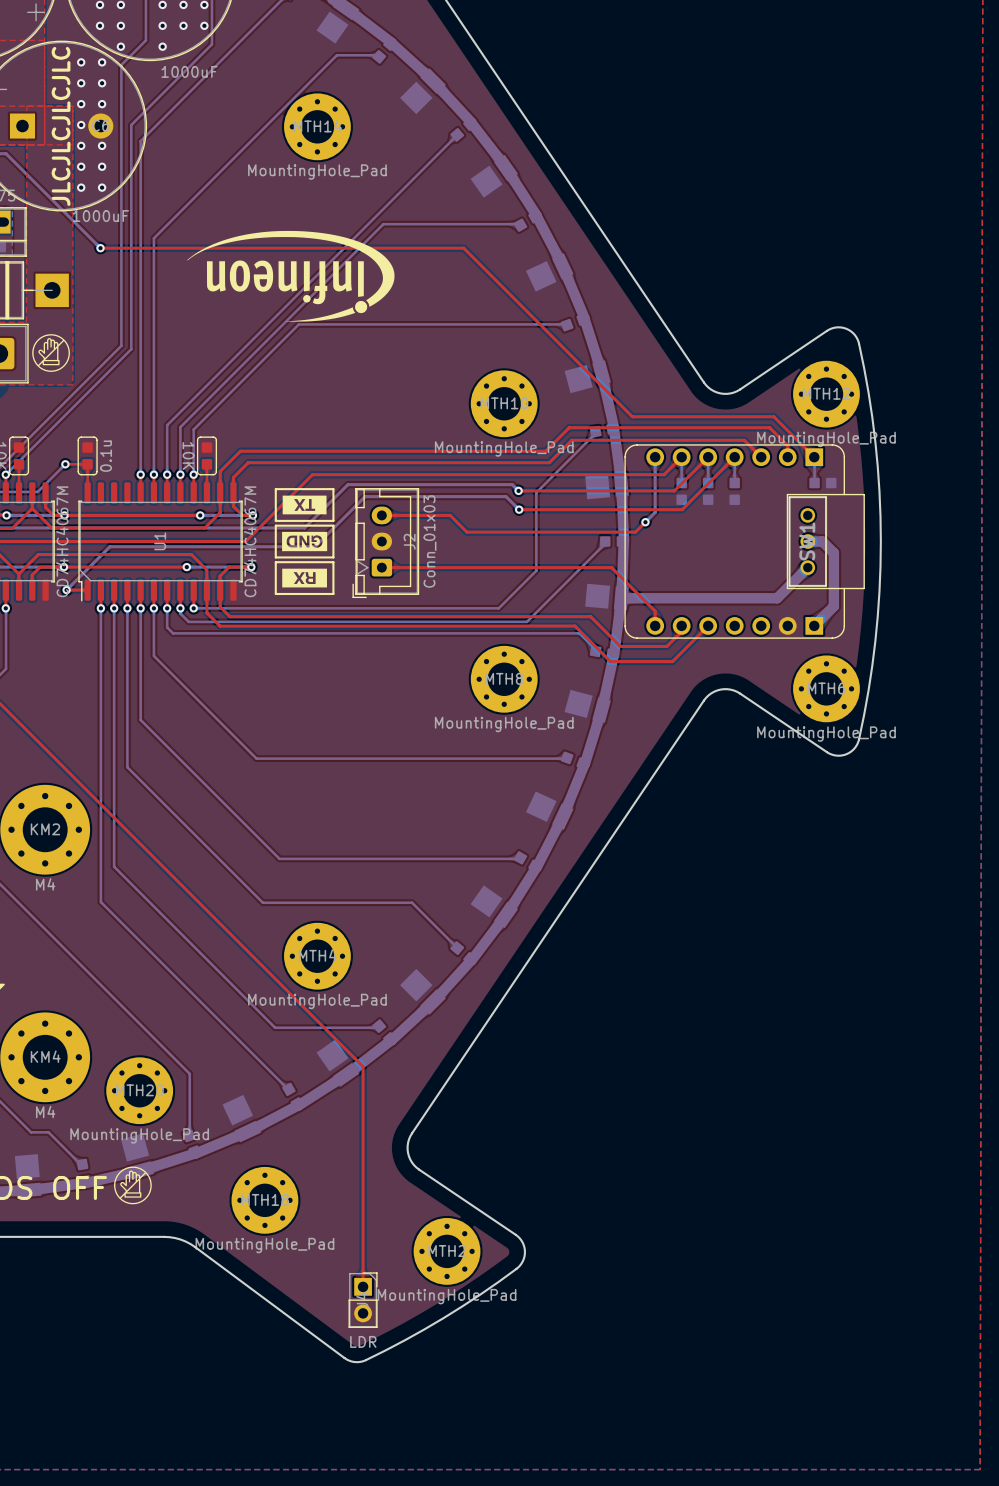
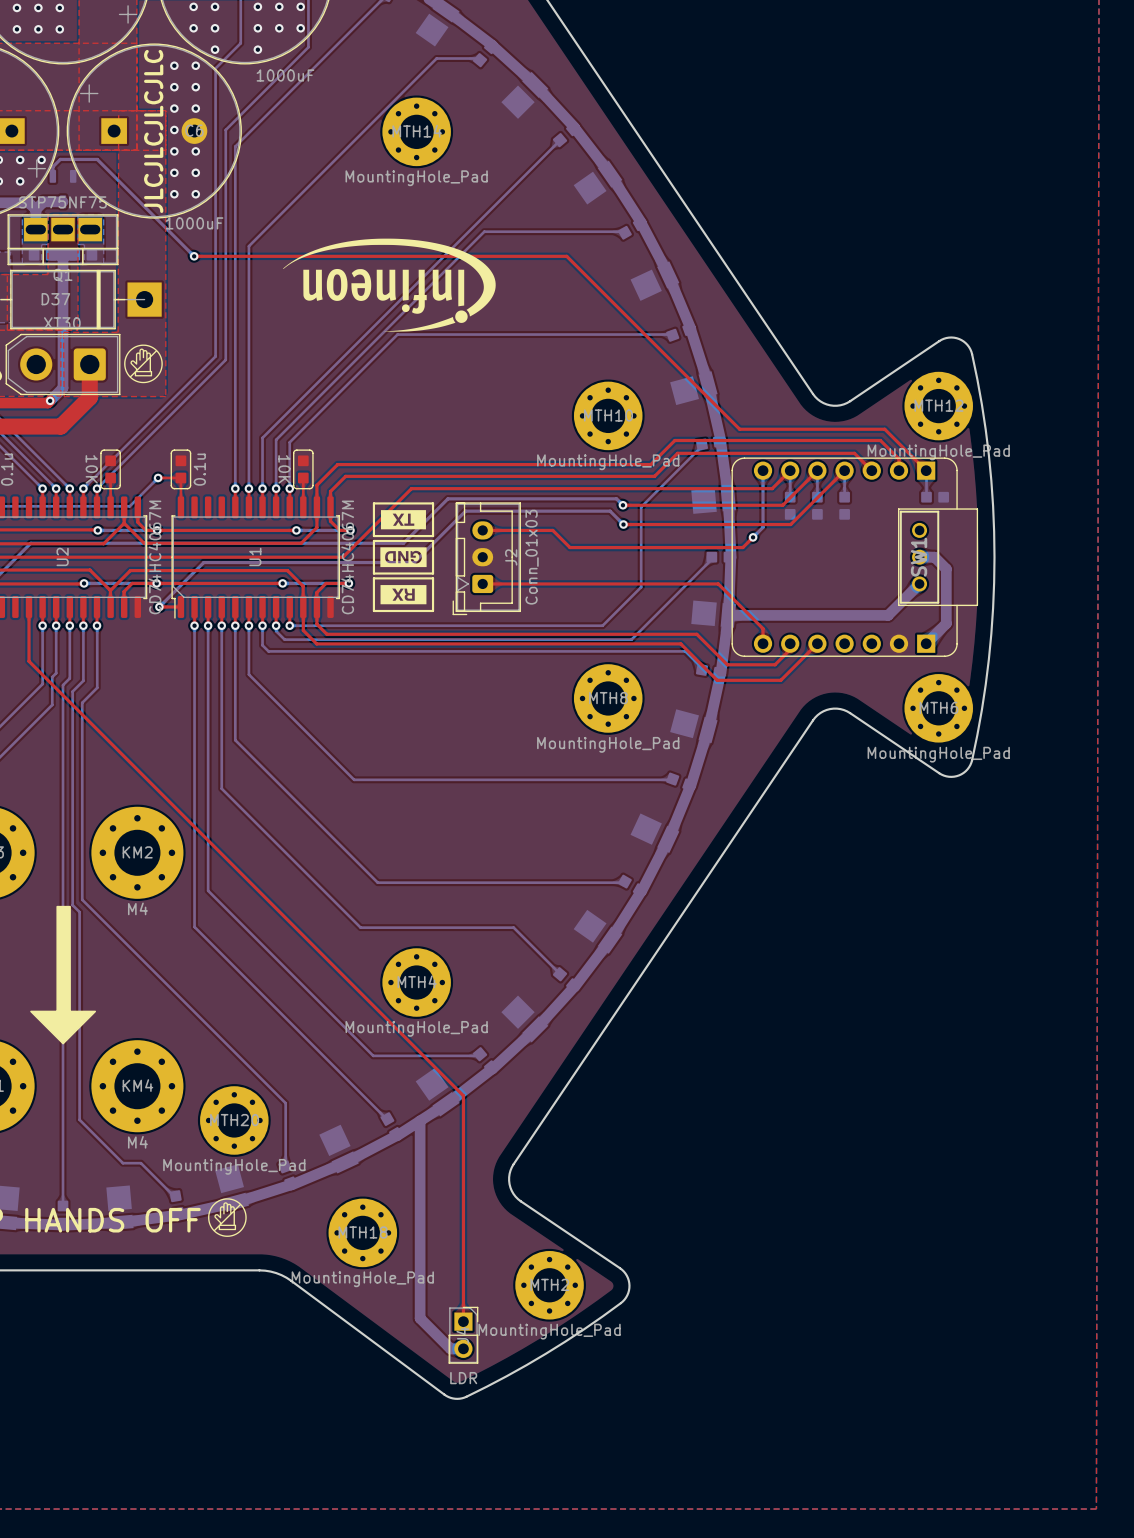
bottom track: none -> (420, 1120) (420, 1318) (450, 1348) (463, 1348)

